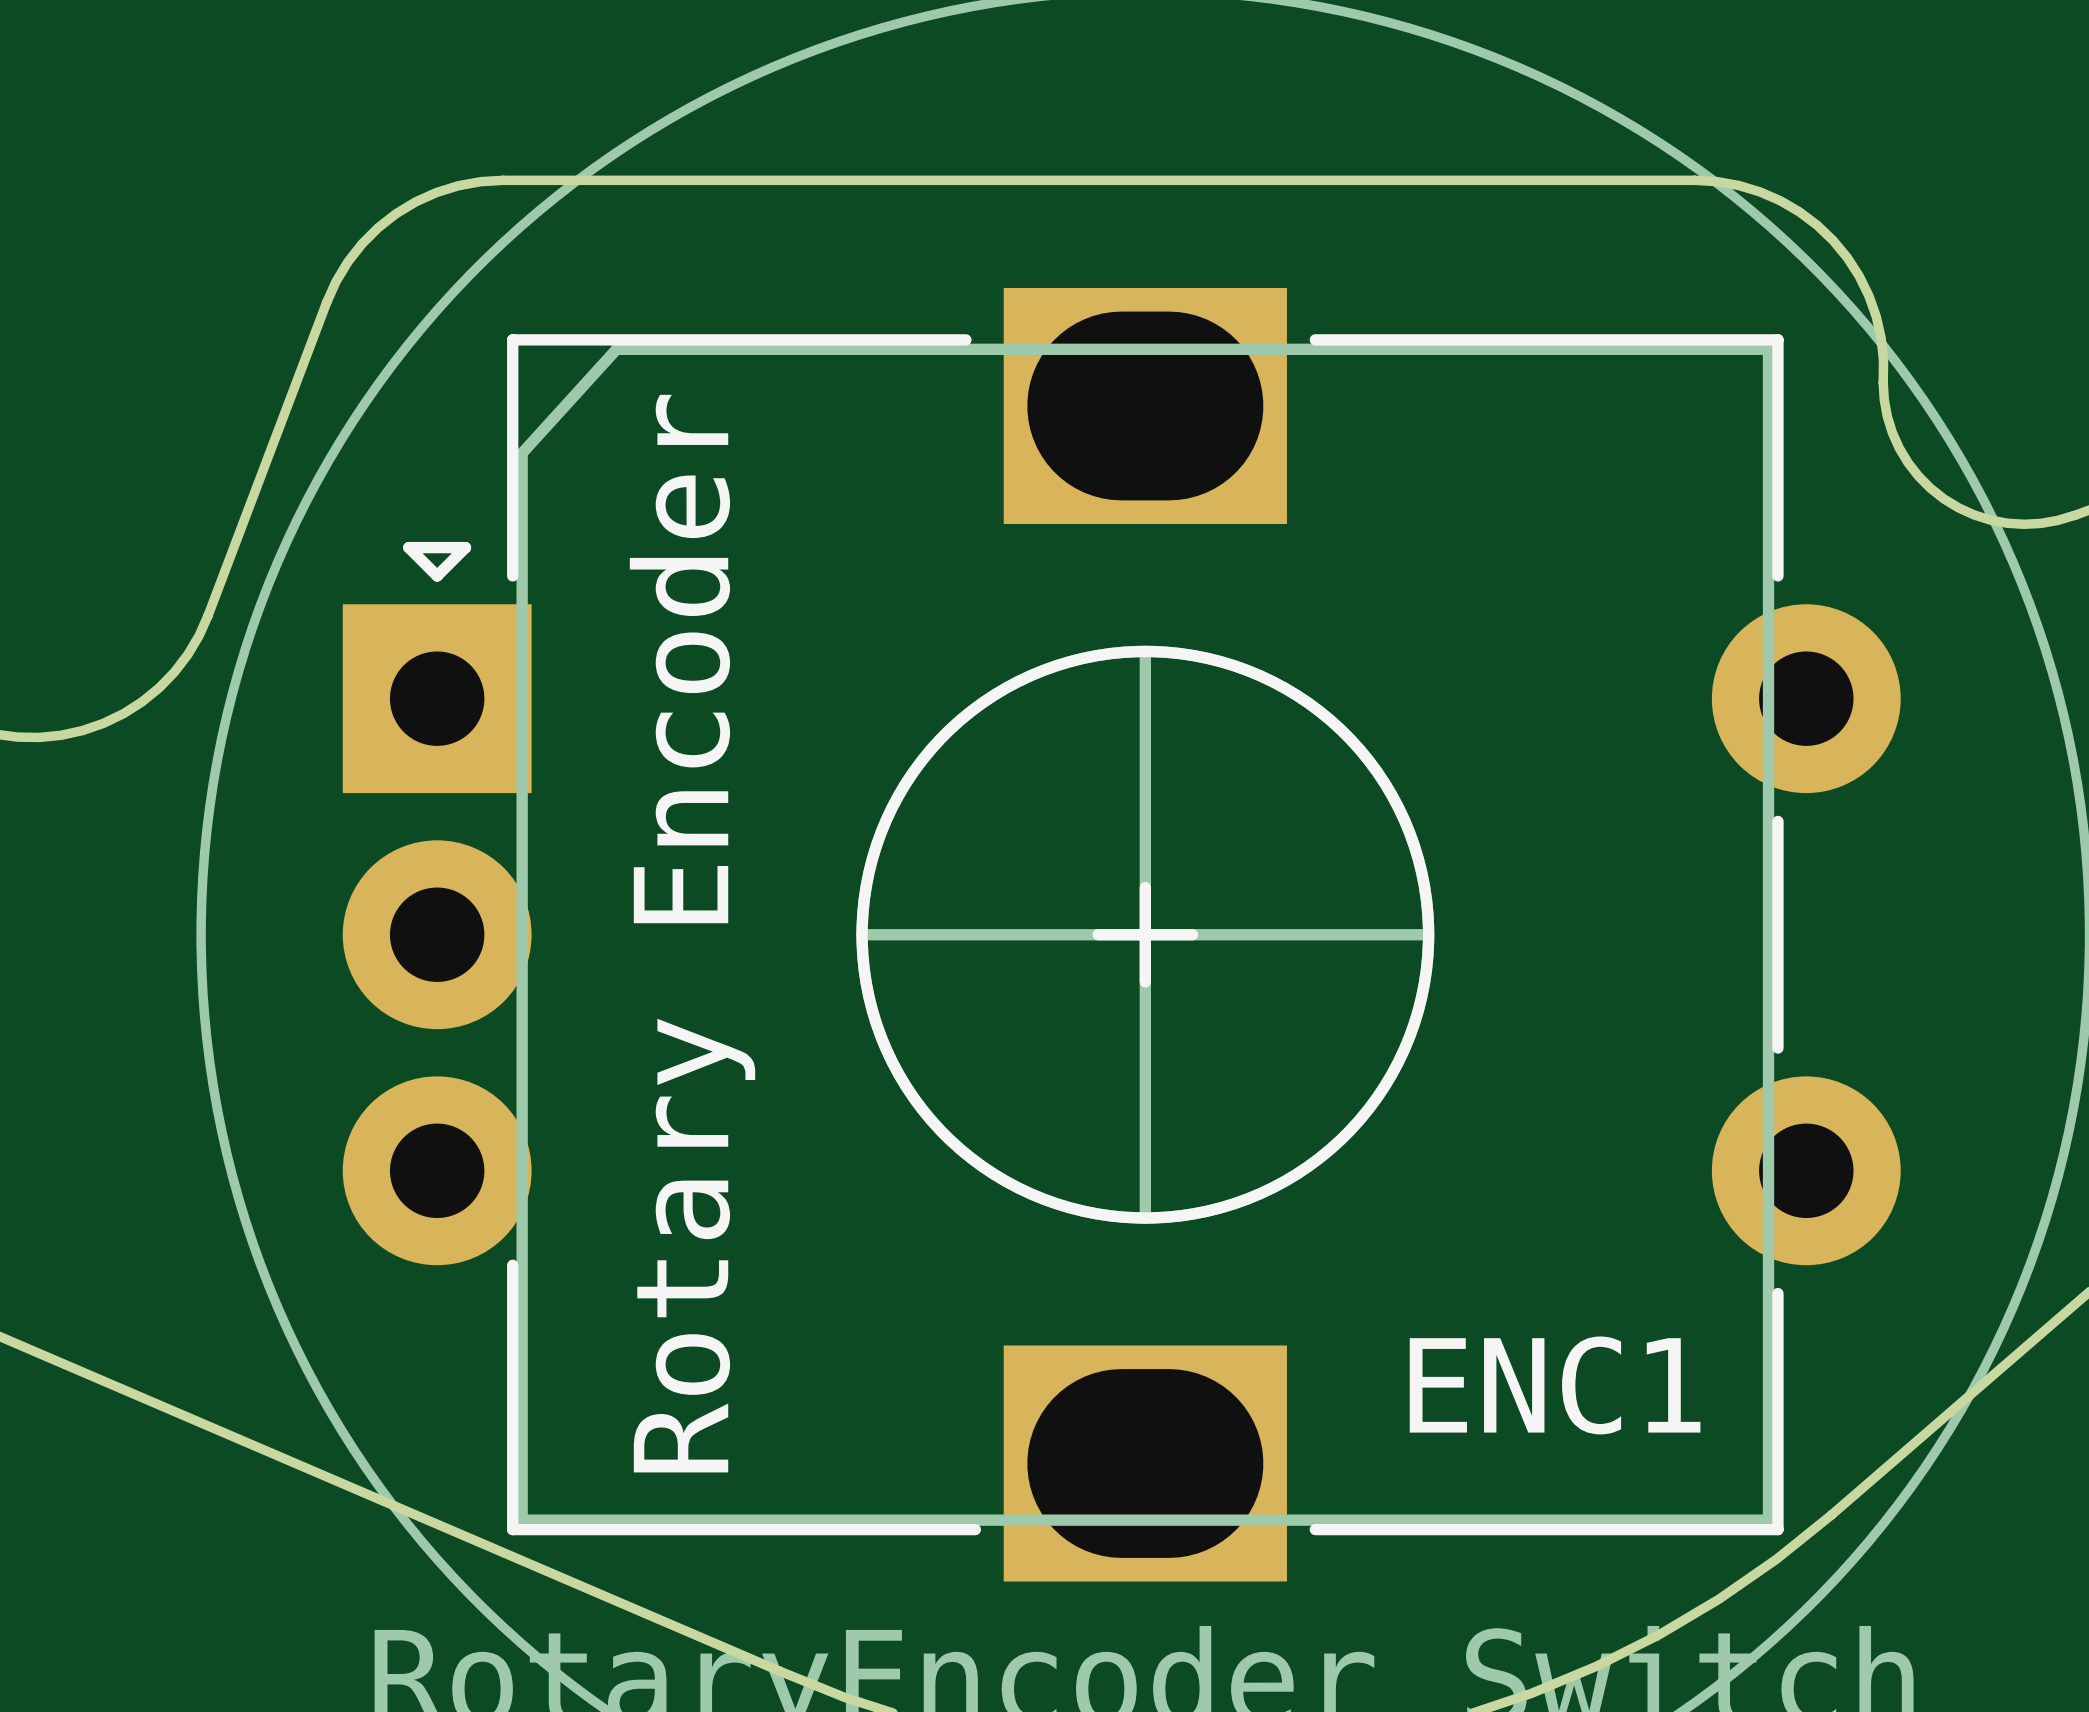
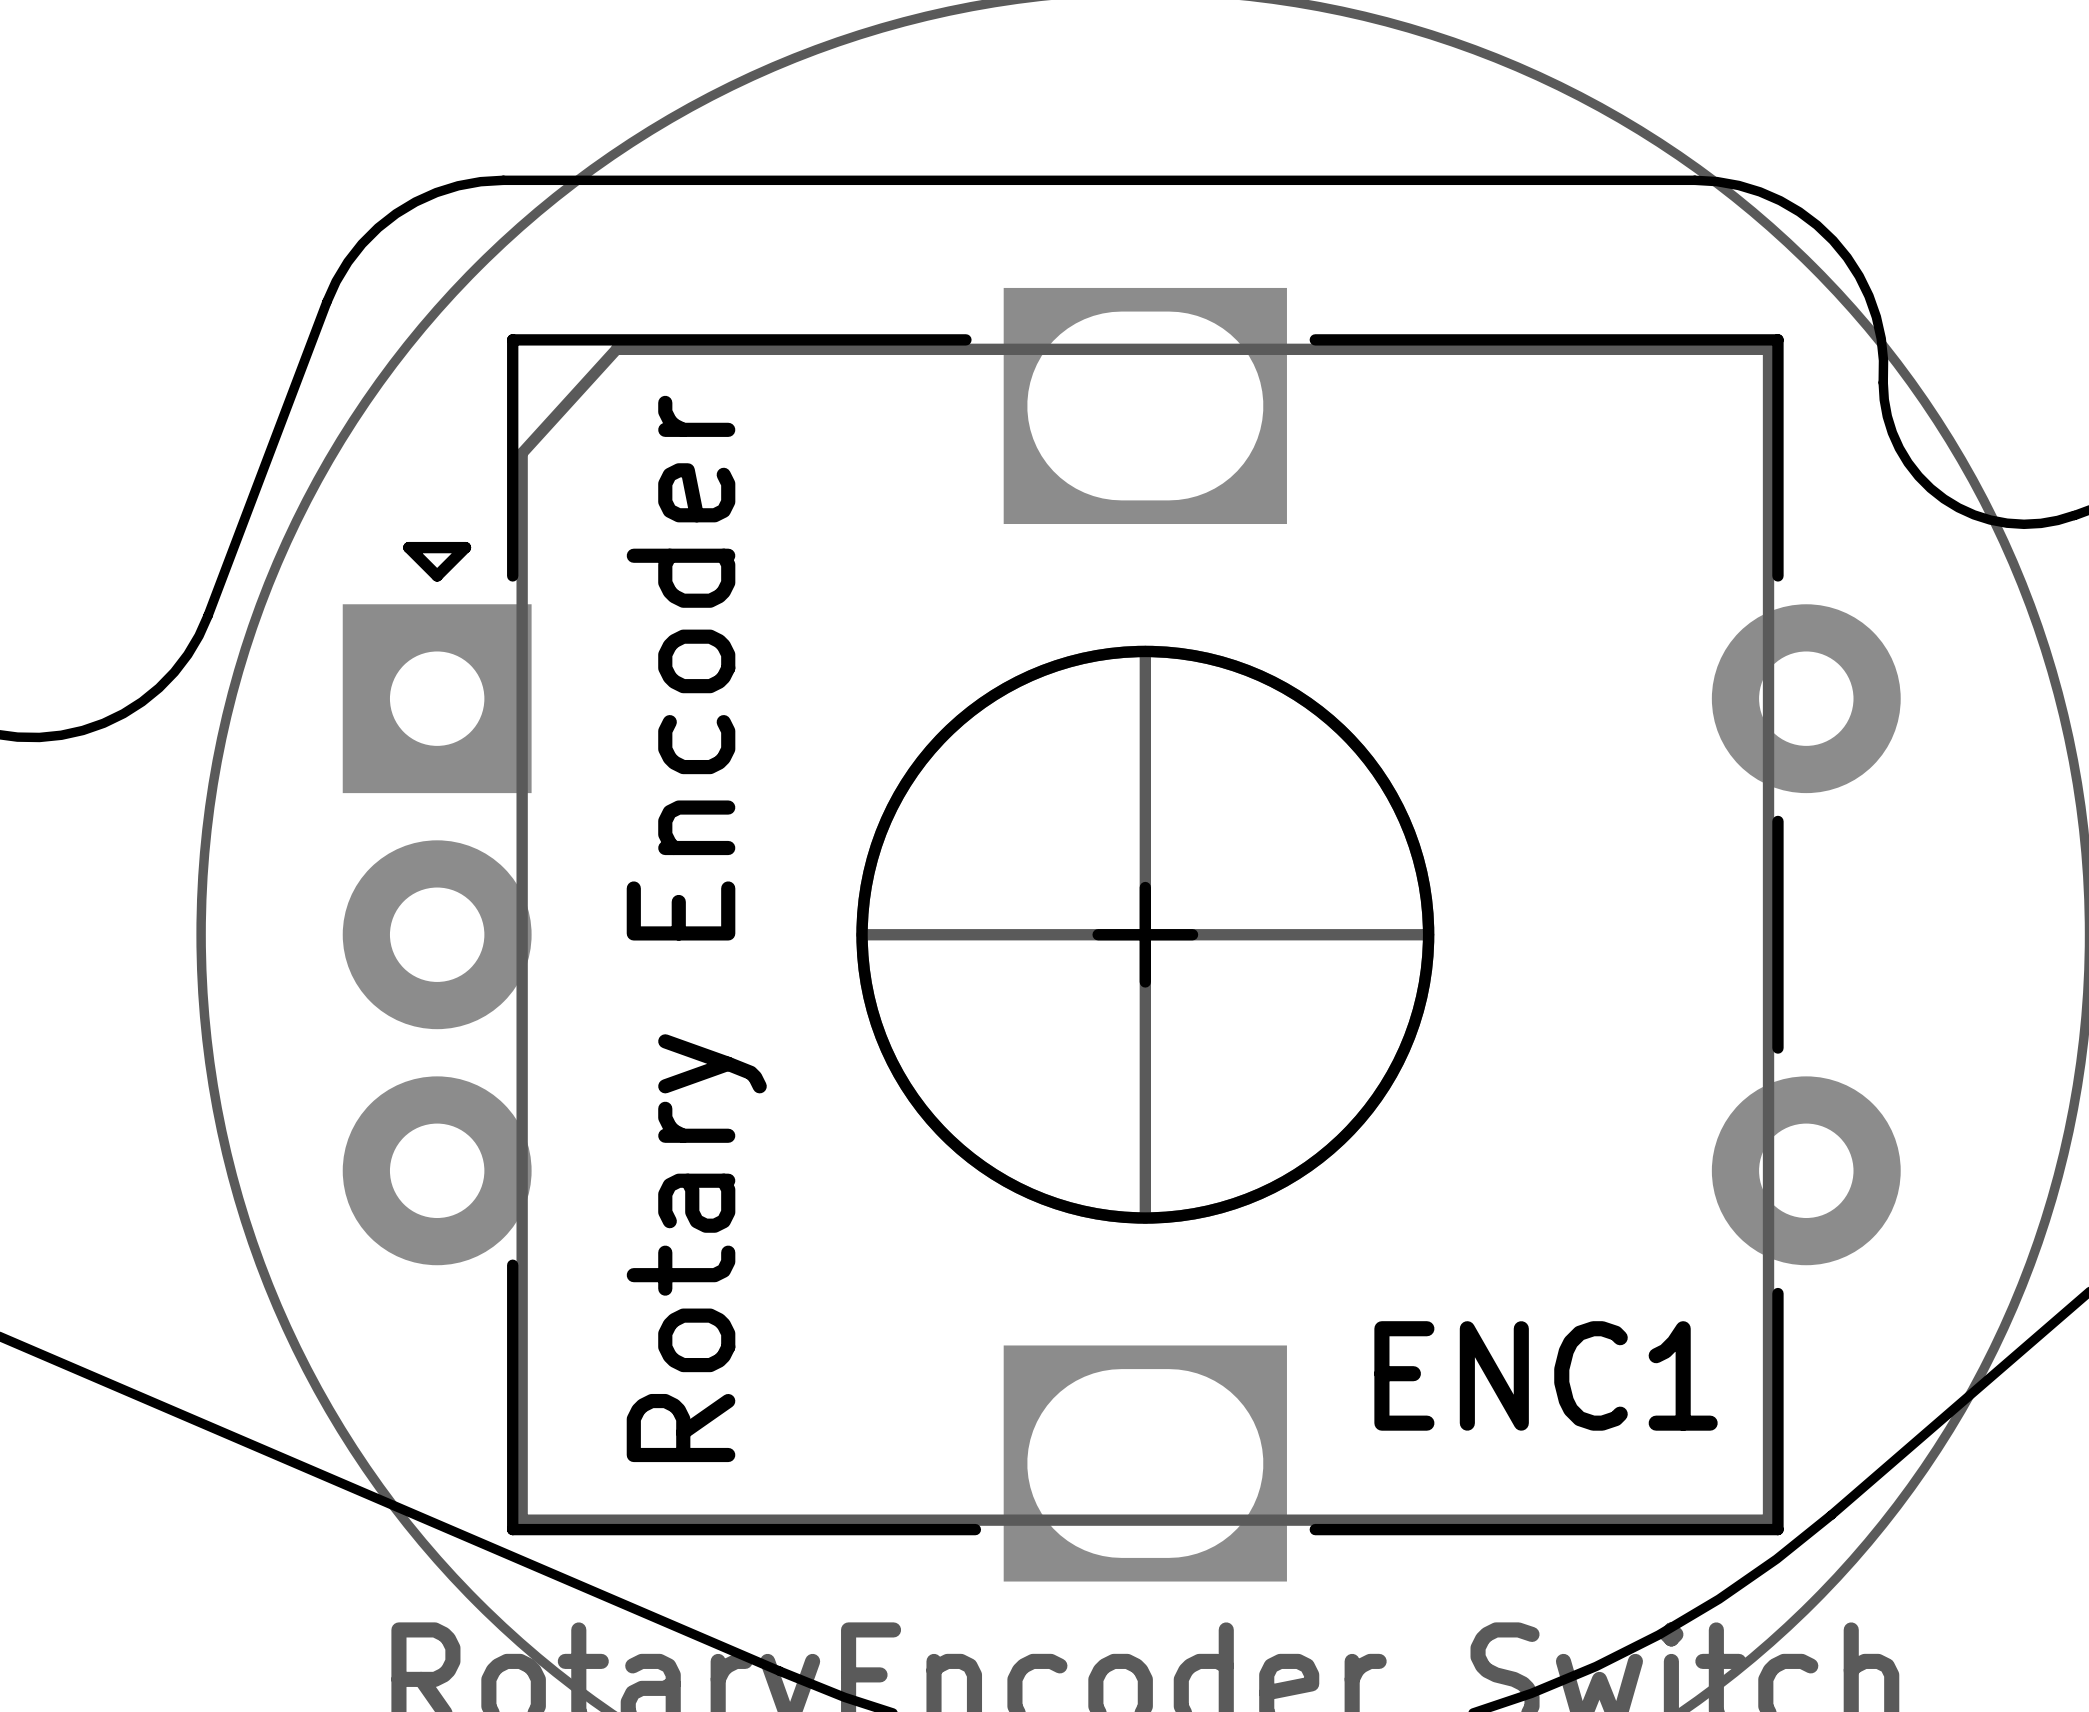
ENC1 name position: ENC1 (1555, 1385) -> ENC1 (1546, 1375)

